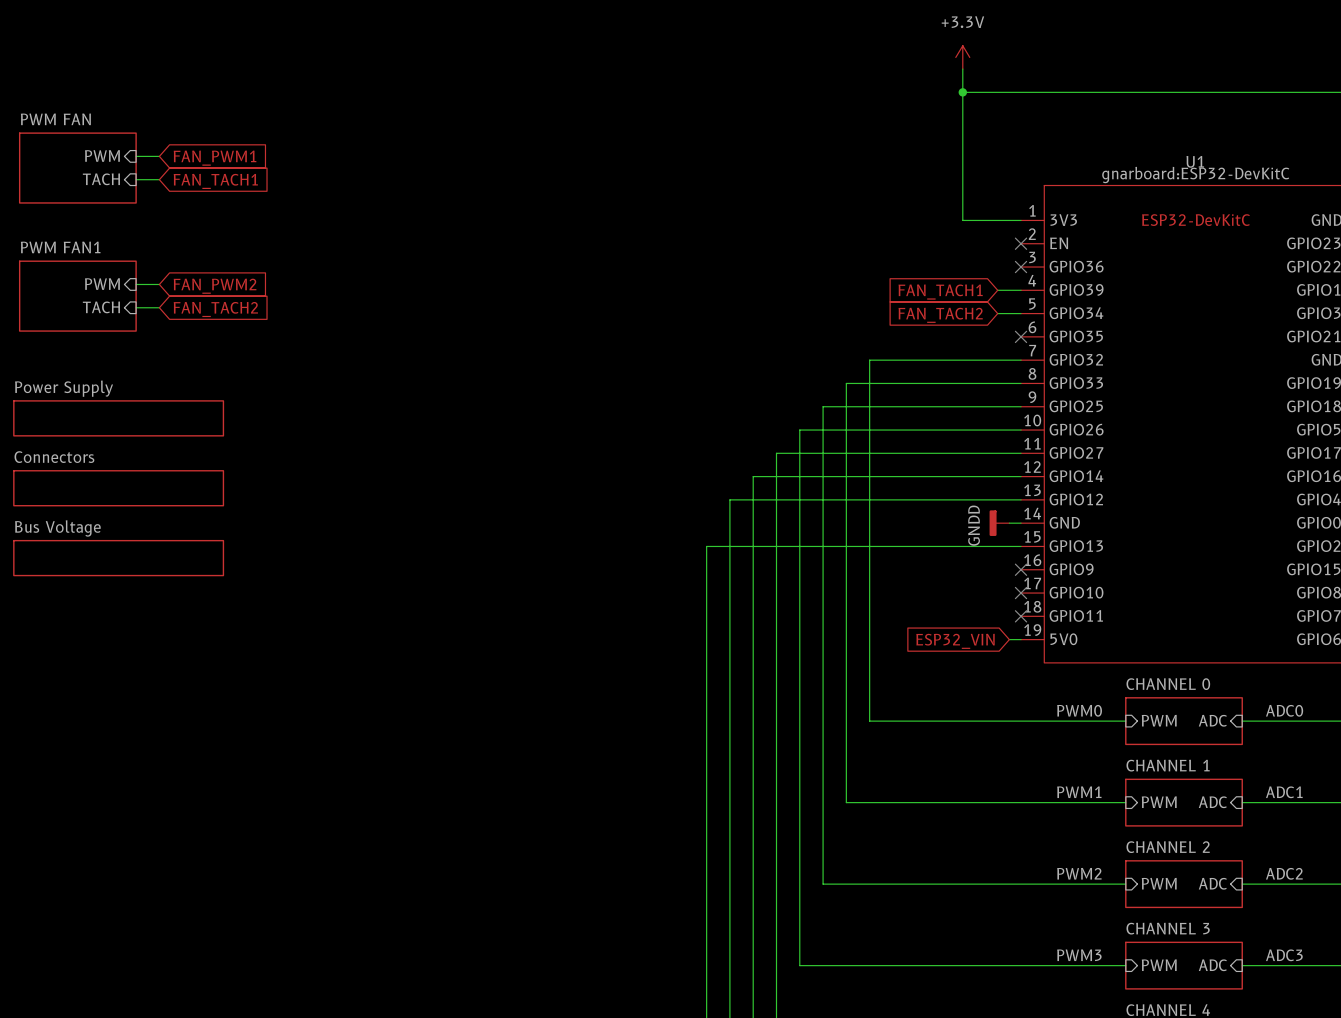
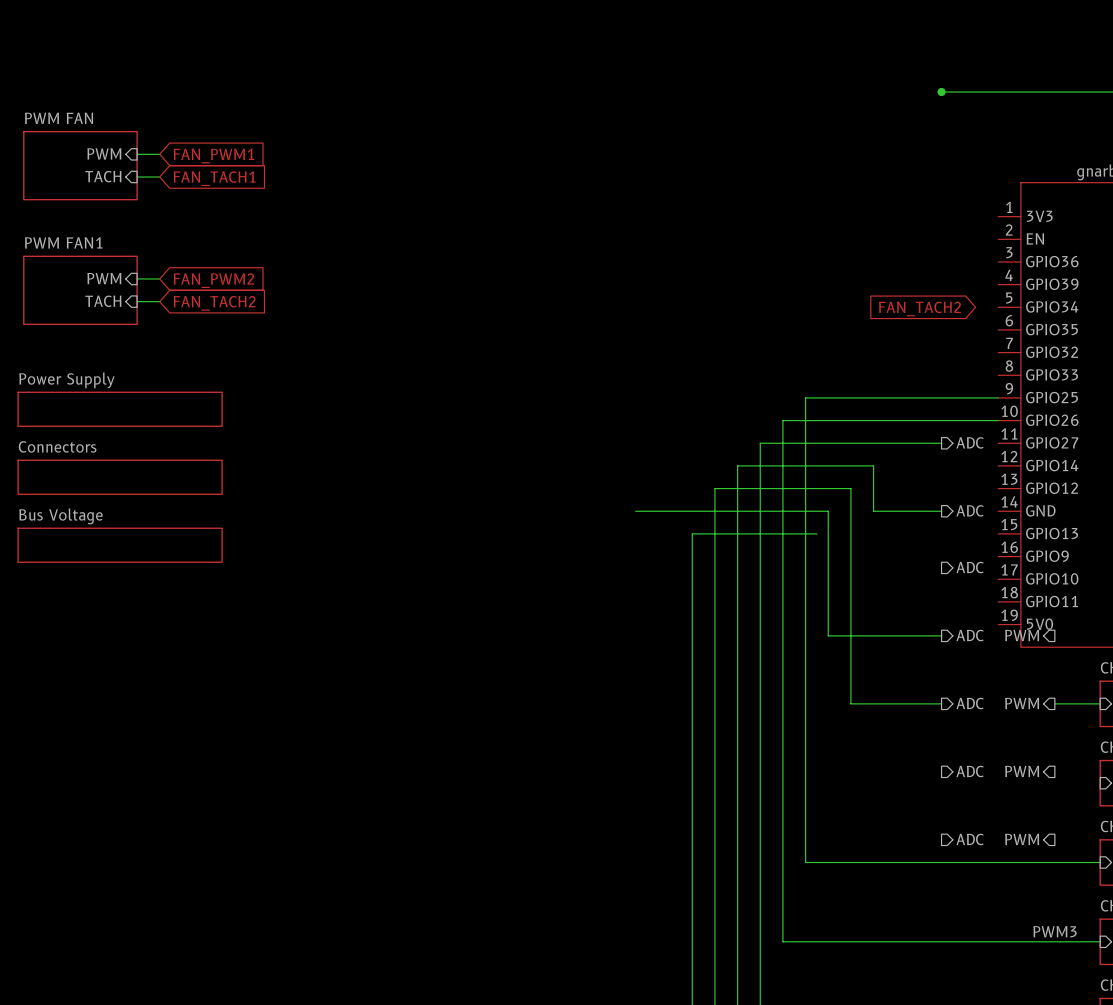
power symbol: +3.3V (962, 57) -> none
wire: (962, 69) (962, 220) (1021, 220) -> none
no-connect mark: (1021, 243) -> none
no-connect mark: (1021, 267) -> none
wire: (997, 290) (1021, 290) -> none
global label: FAN_TACH1 (940, 292) -> none
wire: (997, 313) (1021, 313) -> none
no-connect mark: (1021, 336) -> none
wire: (1021, 360) (869, 360) (869, 499) (1021, 499) -> none
wire: (1021, 383) (846, 383) (846, 523) -> (635, 511) (828, 511)
sheet pin: none -> ADC (970, 442)
wire: (962, 453) (1021, 453) -> none
wire: (892, 476) (1021, 476) -> (873, 465) (873, 511) (941, 511)
sheet pin: none -> ADC (970, 510)
power symbol: GNDD (999, 523) -> none
wire: (1009, 523) (1021, 523) -> none
wire: (834, 546) (1021, 546) -> none
no-connect mark: (1021, 569) -> none
sheet pin: none -> ADC (970, 567)
no-connect mark: (1021, 593) -> none
no-connect mark: (1021, 616) -> none
wire: (1009, 639) (1021, 639) -> none
global label: ESP32_VIN (955, 641) -> none
sheet pin: none -> ADC (970, 635)
sheet pin: none -> PWM (1022, 635)
wire: (846, 651) (846, 802) (1125, 802) -> (828, 635) (941, 635)
label: PWM0 (1079, 710) -> none
sheet pin: none -> ADC (970, 703)
sheet pin: none -> PWM (1022, 703)
wire: (962, 721) (1079, 721) -> none
sheet pin: none -> ADC (970, 771)
sheet pin: none -> PWM (1022, 771)
label: PWM1 (1079, 792) -> none
sheet pin: none -> ADC (970, 839)
sheet pin: none -> PWM (1022, 839)
label: PWM2 (1079, 873) -> none

